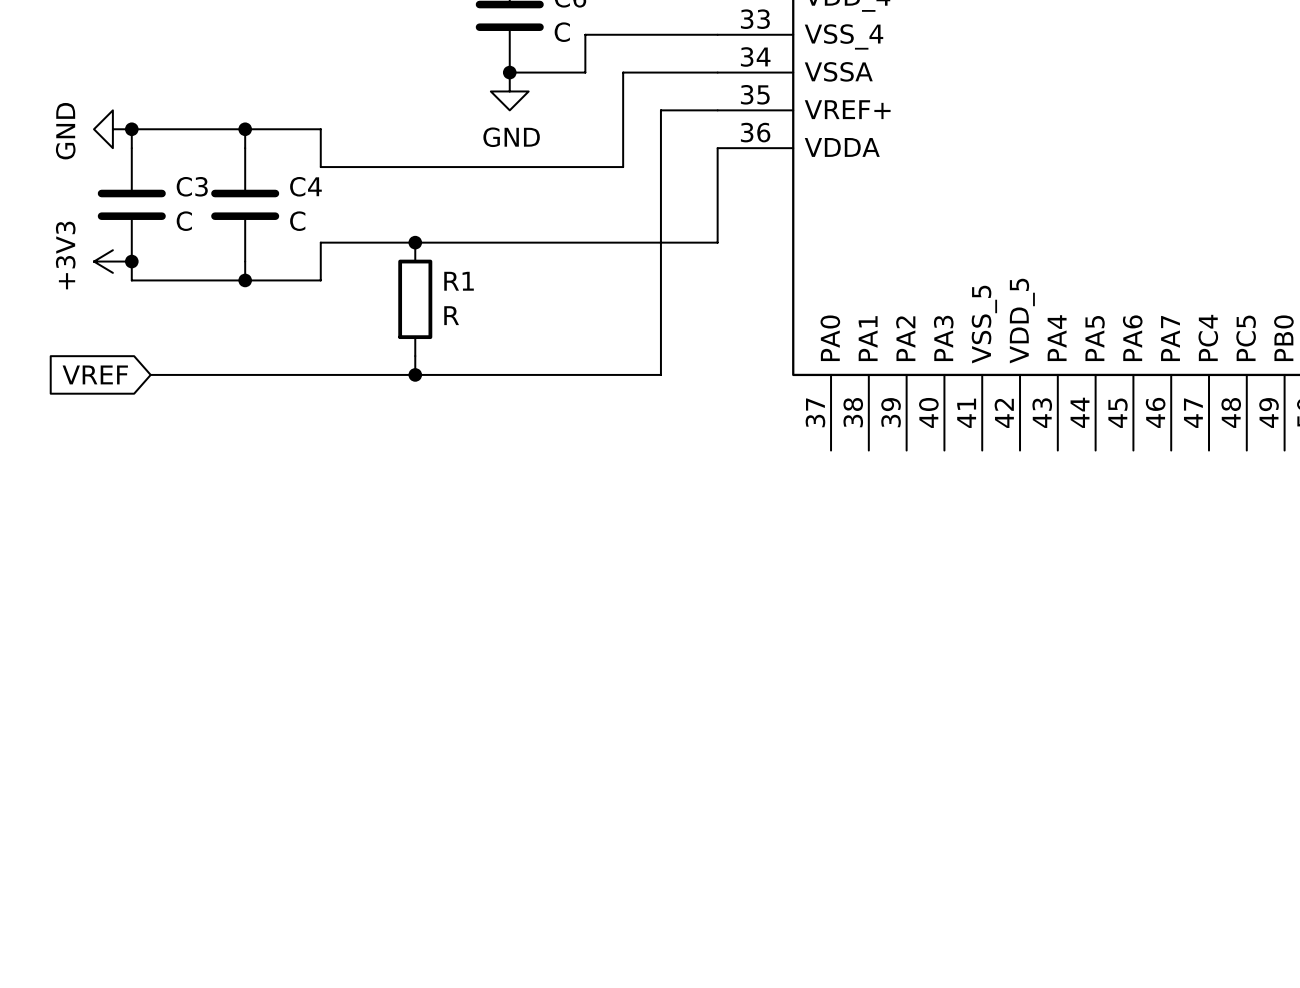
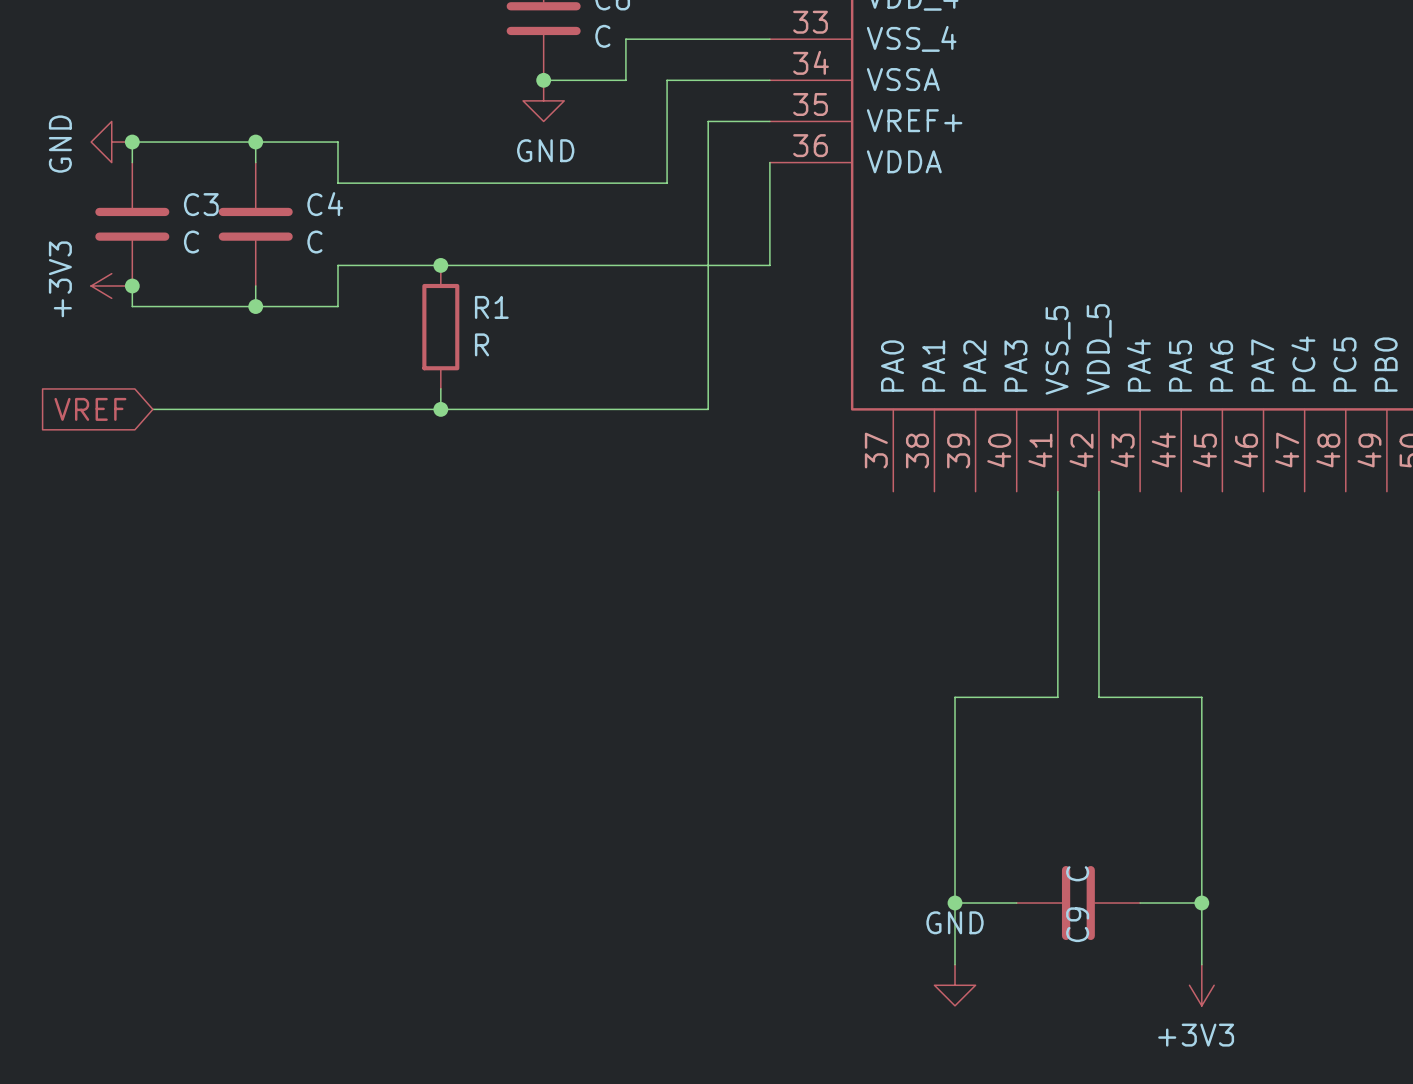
wire: none -> (1057, 491) (1057, 697) (955, 697) (955, 964)
wire: none -> (1098, 491) (1098, 697) (1201, 697) (1201, 964)
wire: none -> (955, 903) (1016, 903)
junction: none -> (955, 903)
C9: none -> C (1078, 903)
wire: none -> (1140, 903) (1201, 903)
junction: none -> (1201, 903)
power symbol: none -> GND (955, 985)
power symbol: none -> +3V3 (1201, 985)

